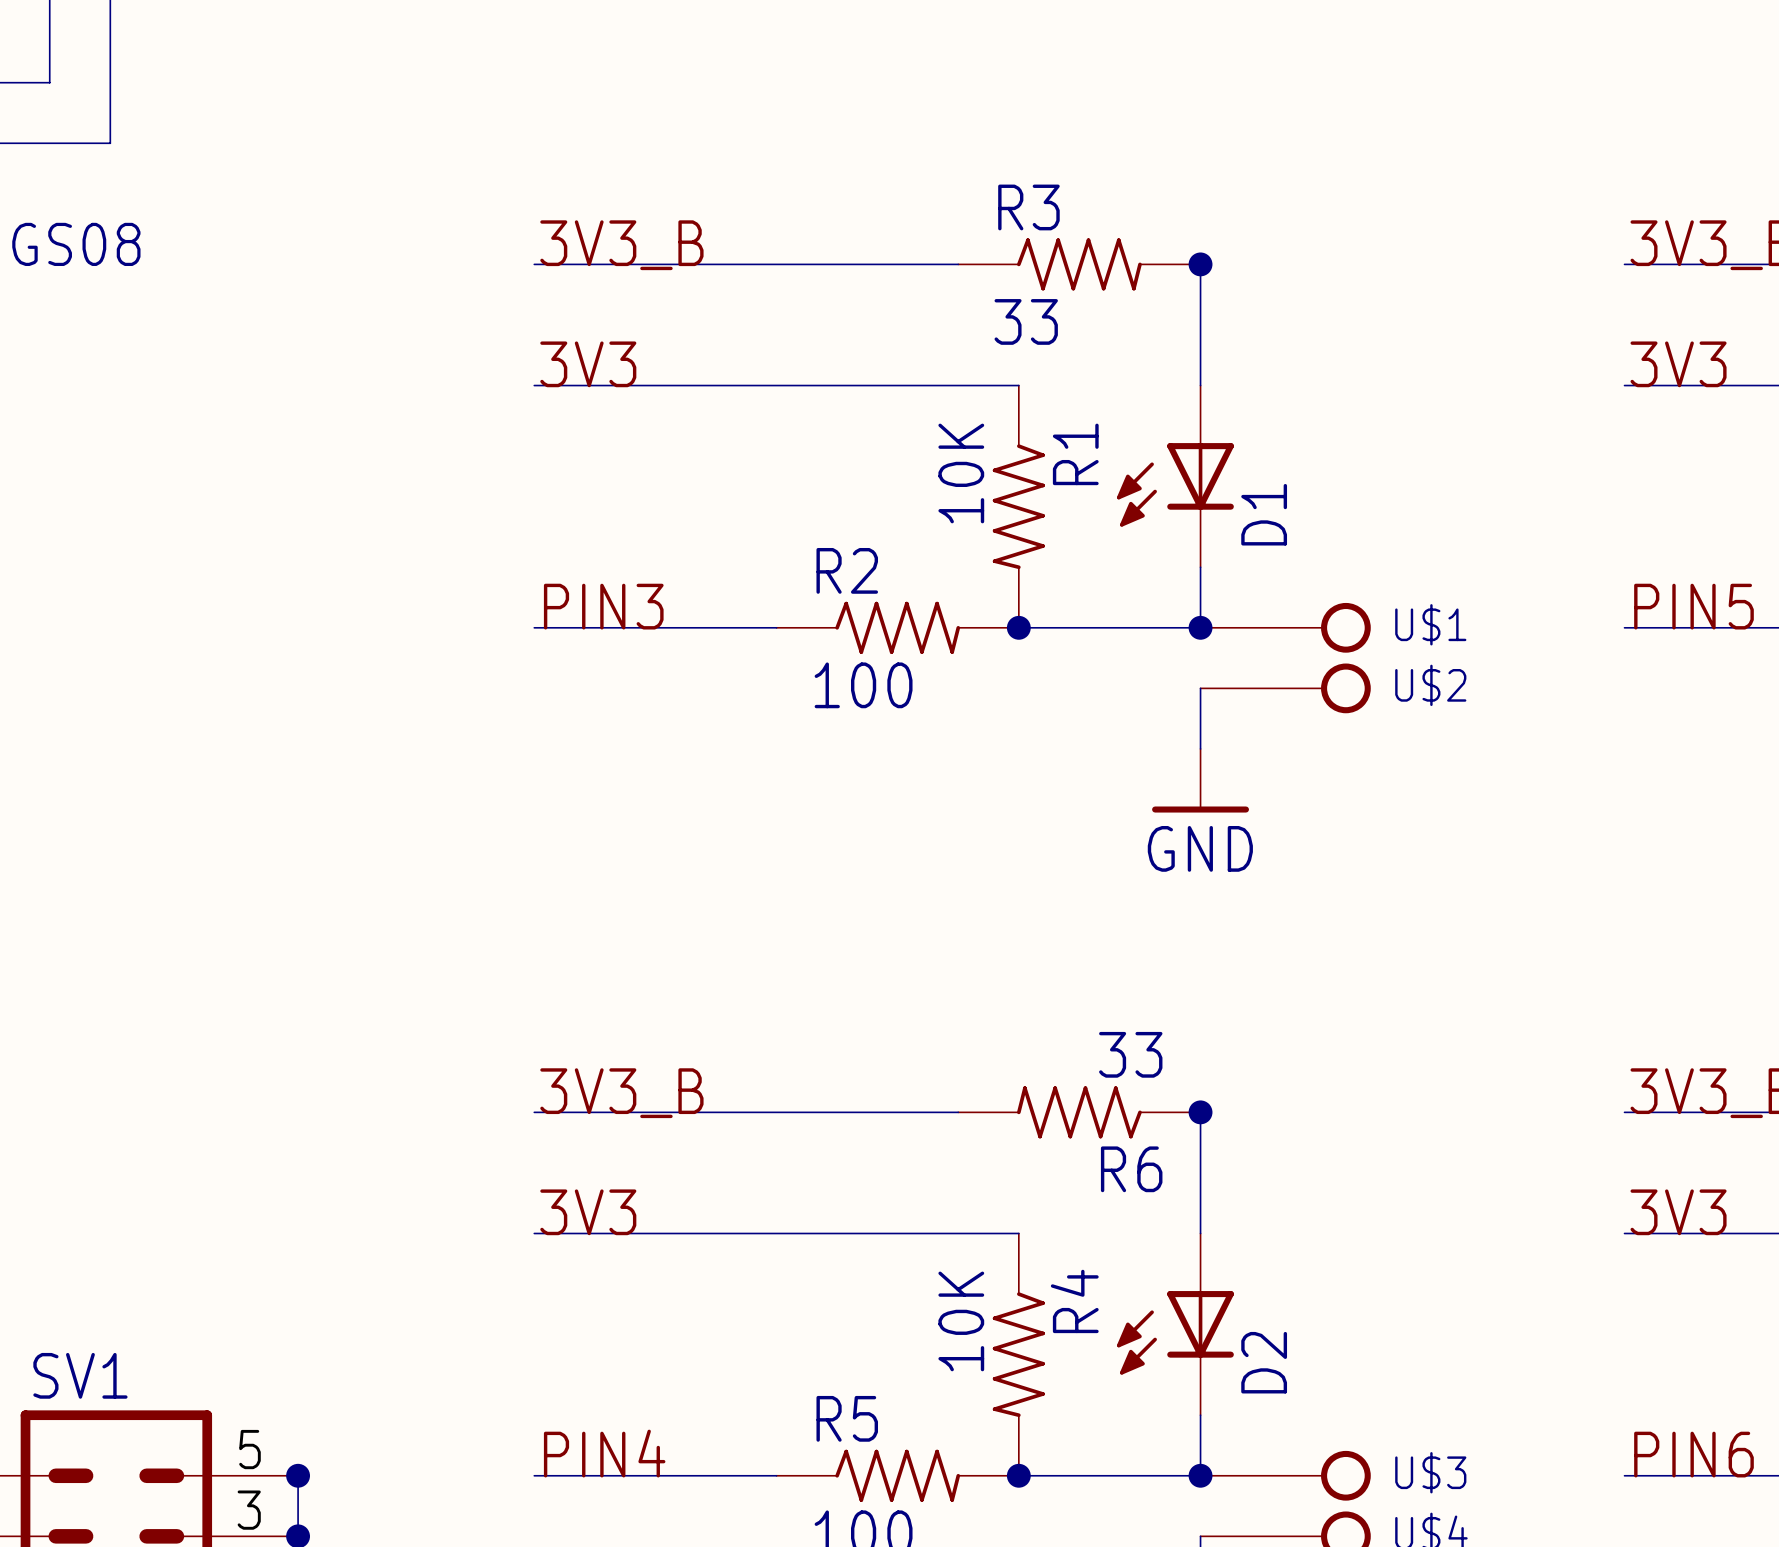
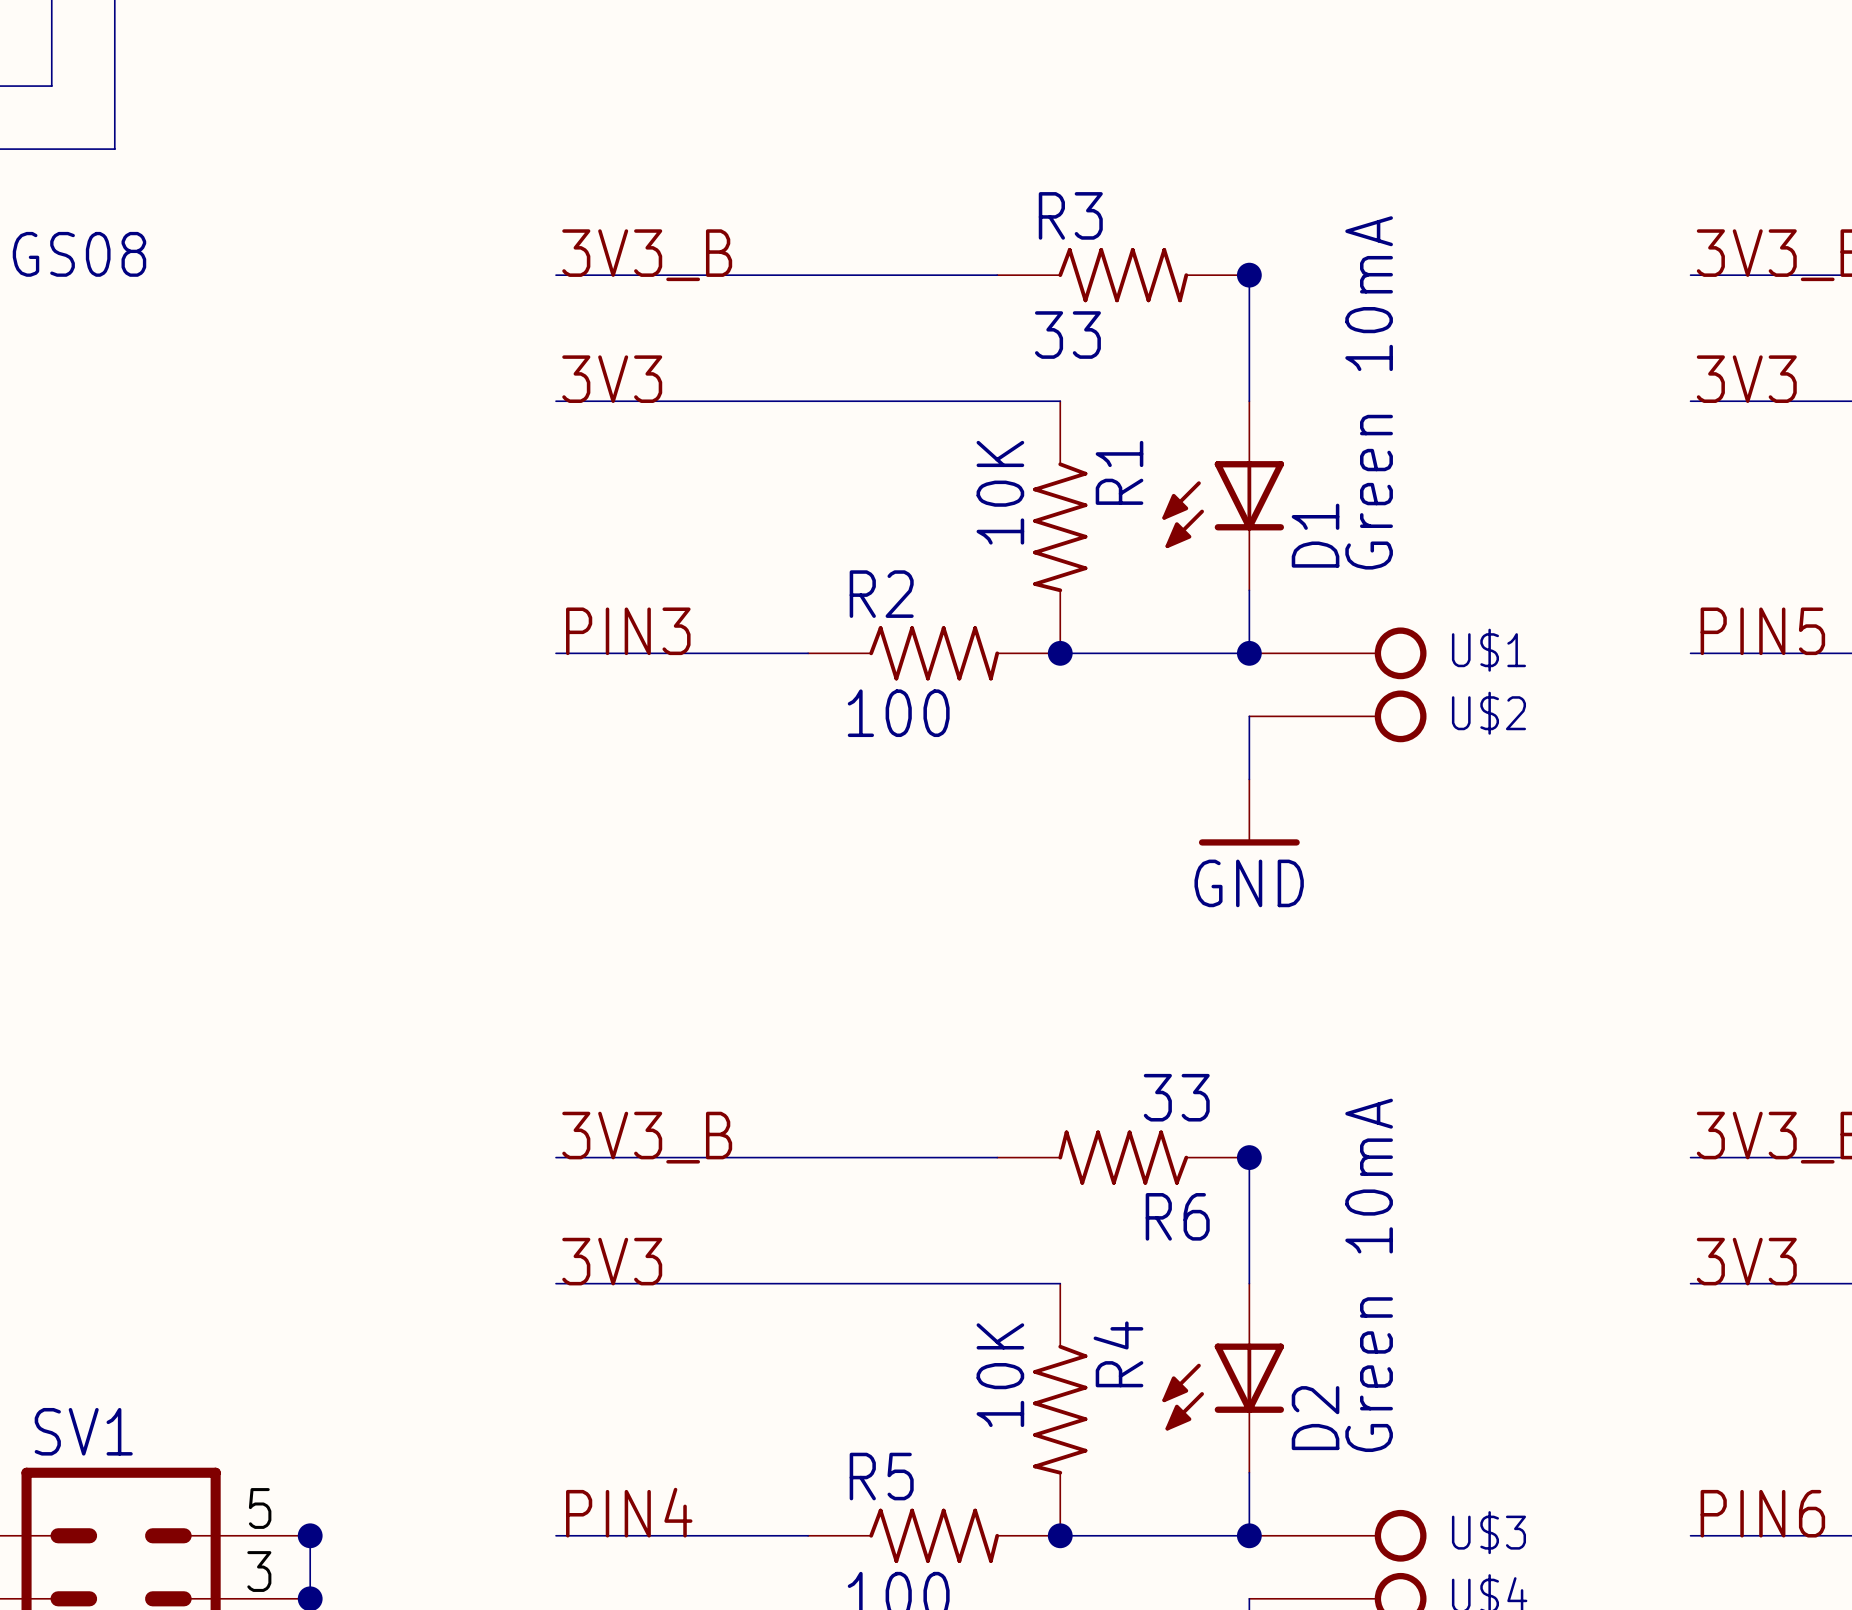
D1 value: none -> Green 10mA (1369, 392)
D2 value: none -> Green 10mA (1369, 1275)

